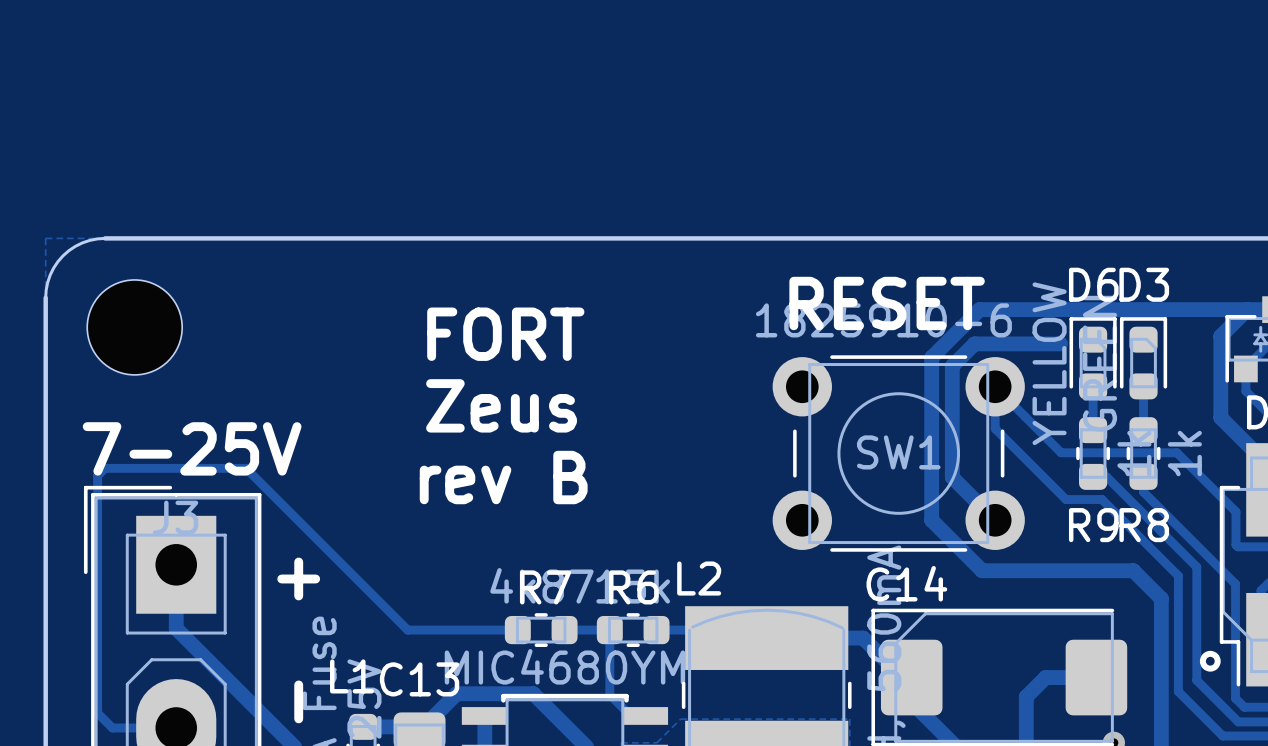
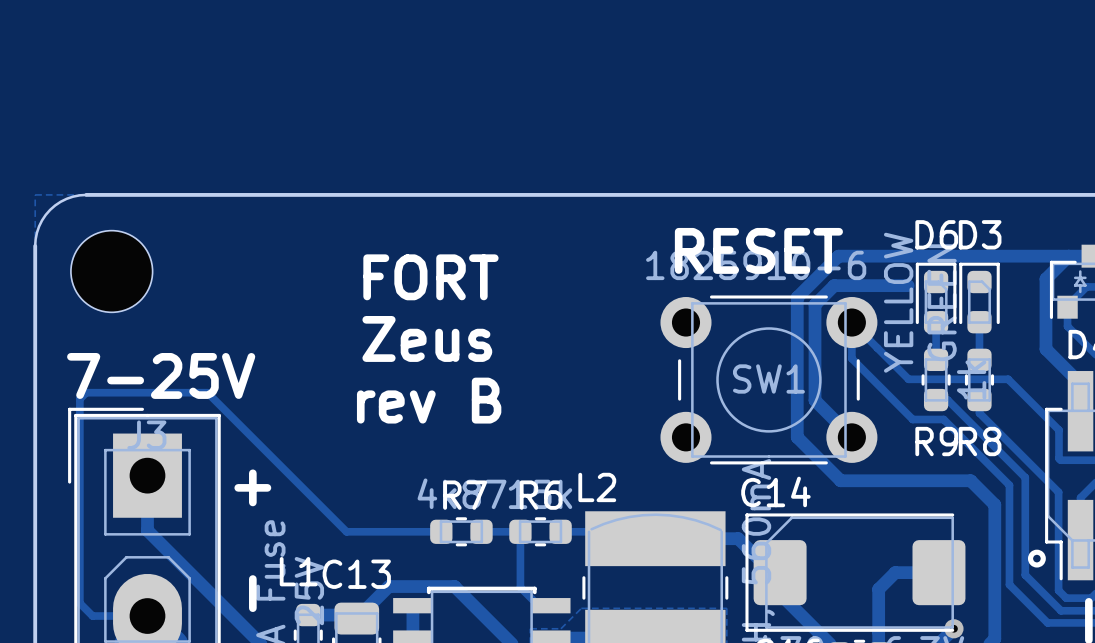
R8 value: 1k (1184, 453) -> none
part value: MIC4680YM (564, 666) -> none

